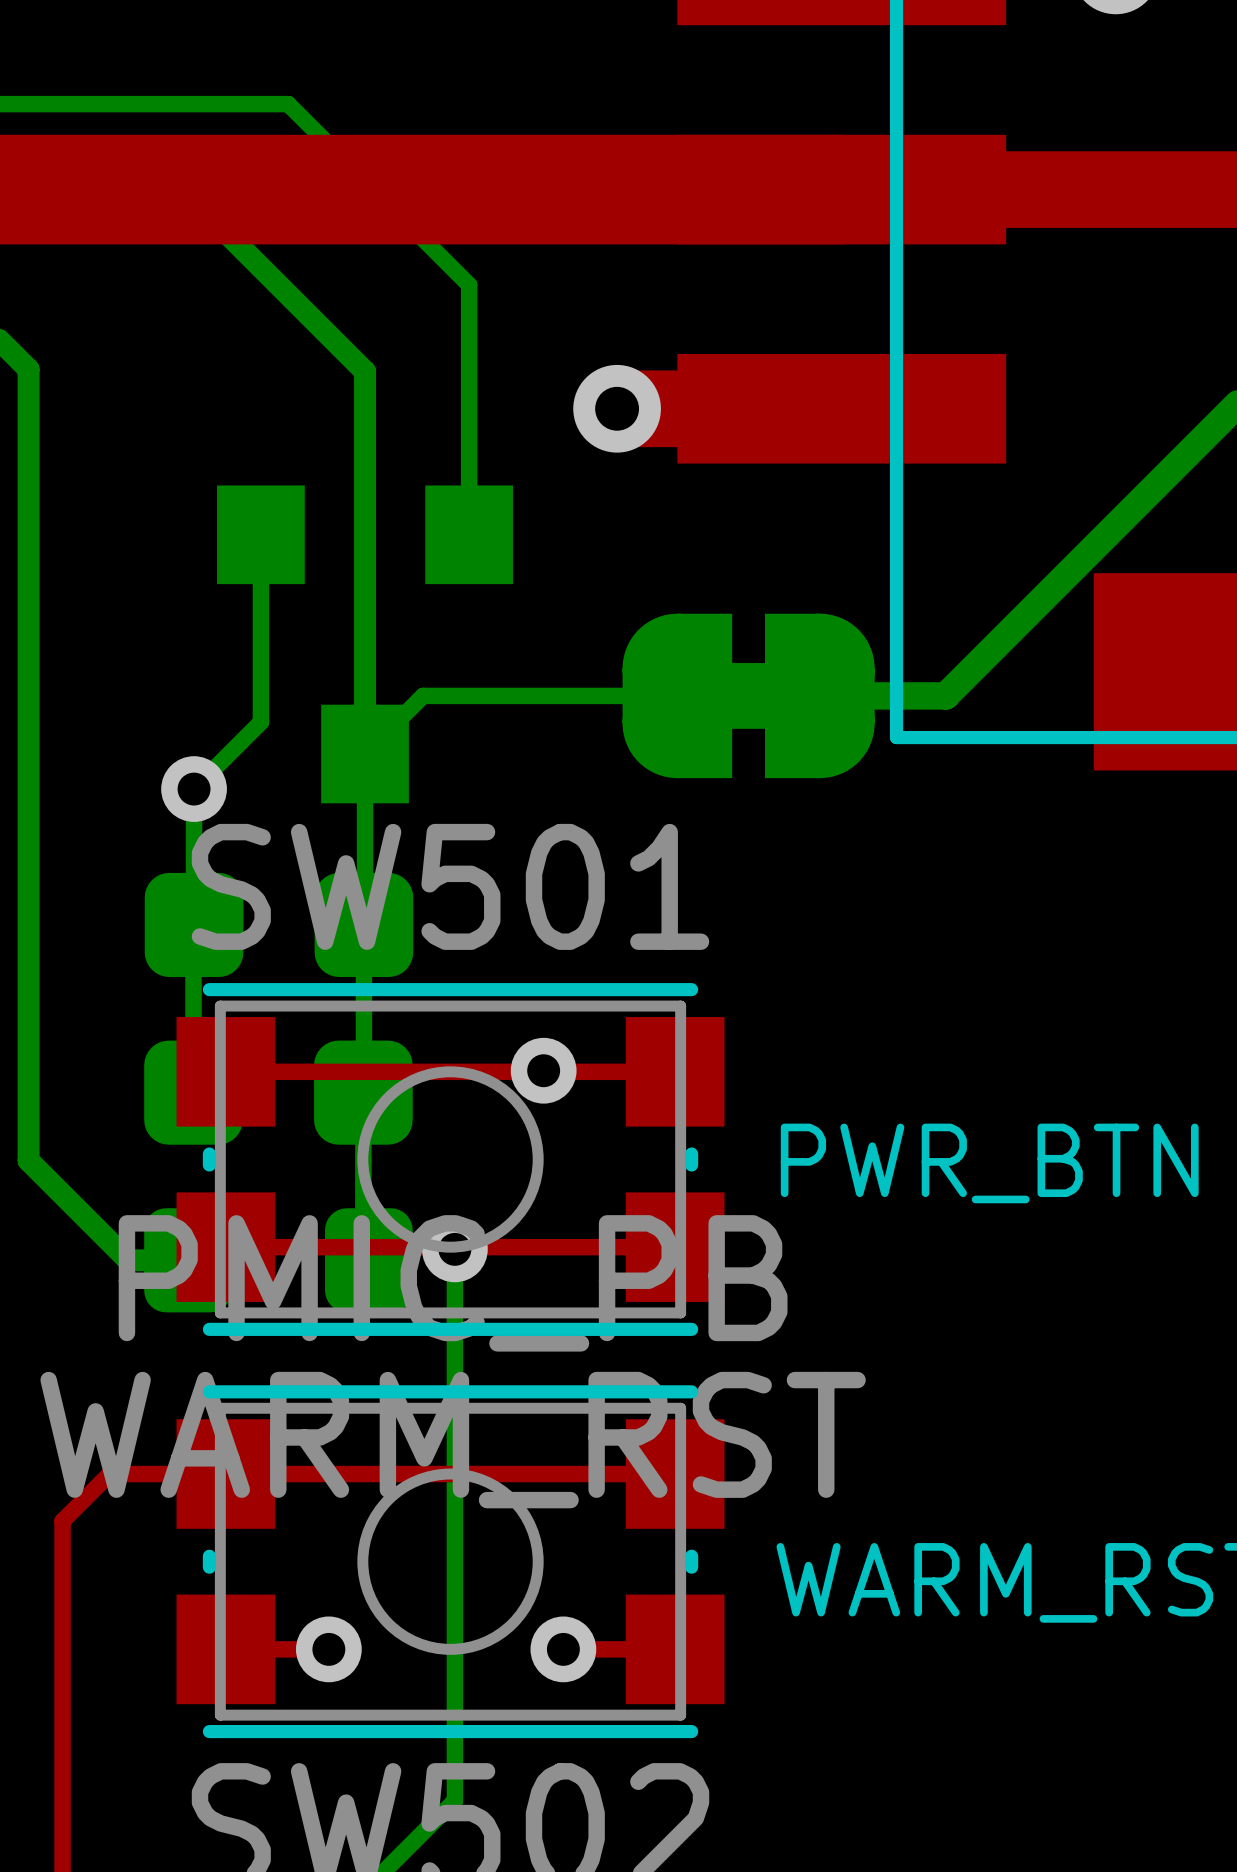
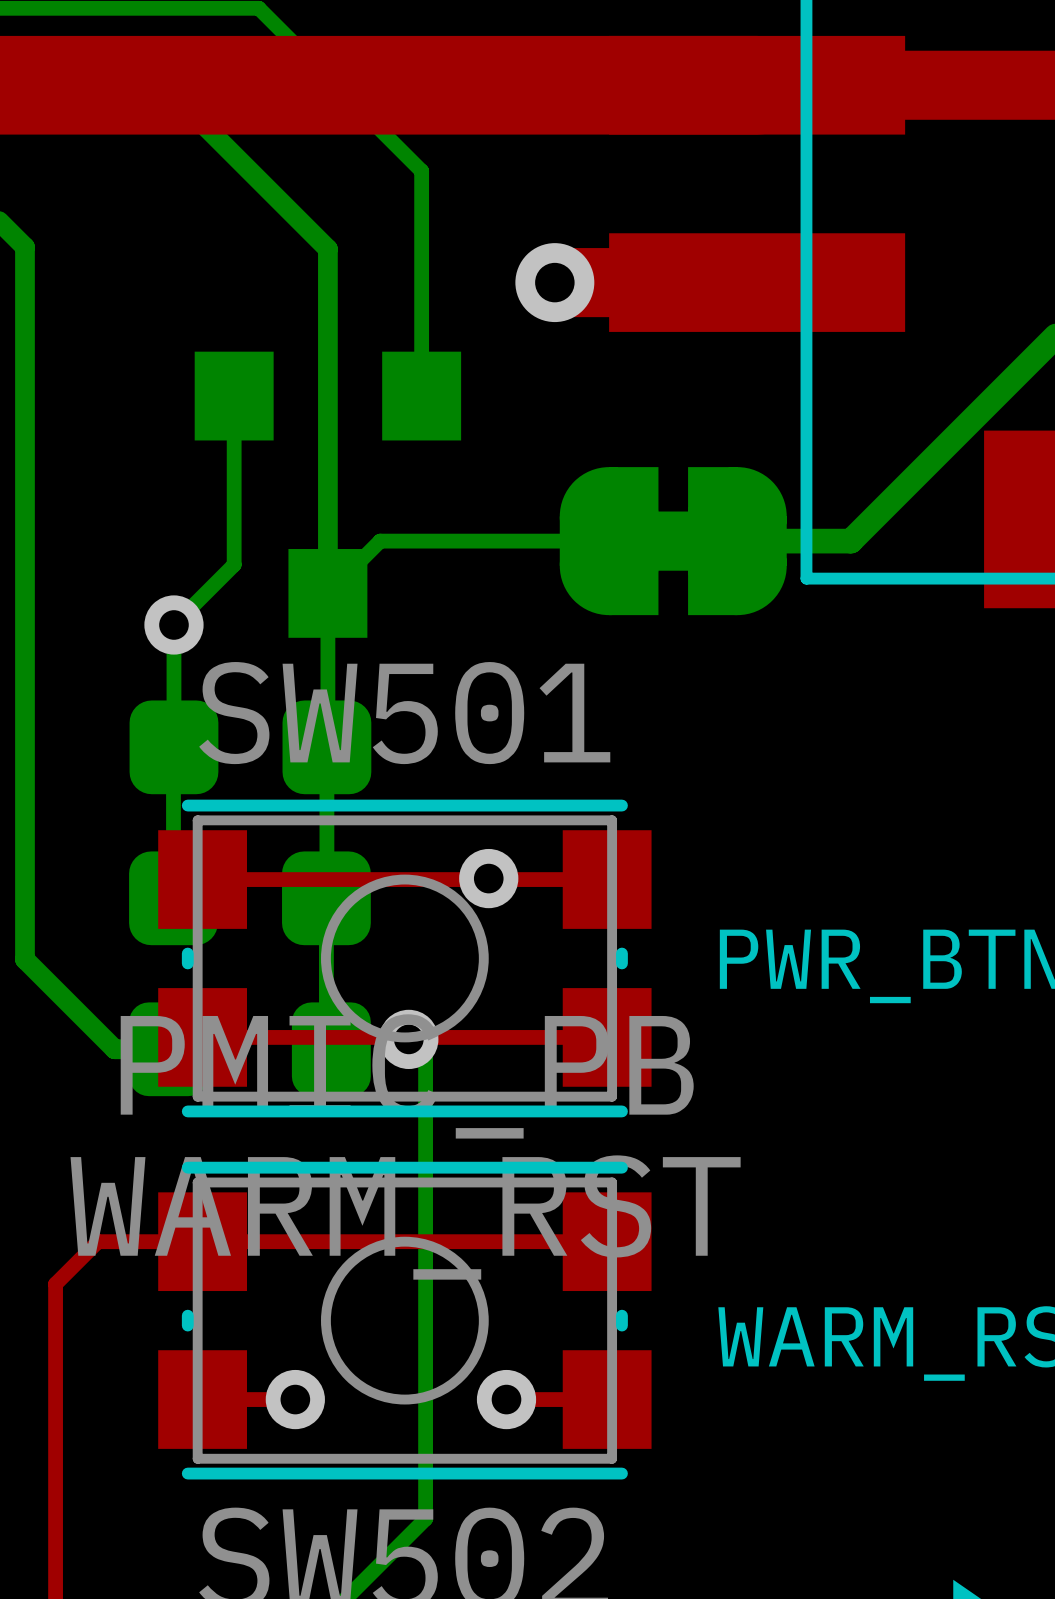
bottom track: (454, 1249) (454, 1800) -> (425, 1037) (425, 1518) (408, 1535)

